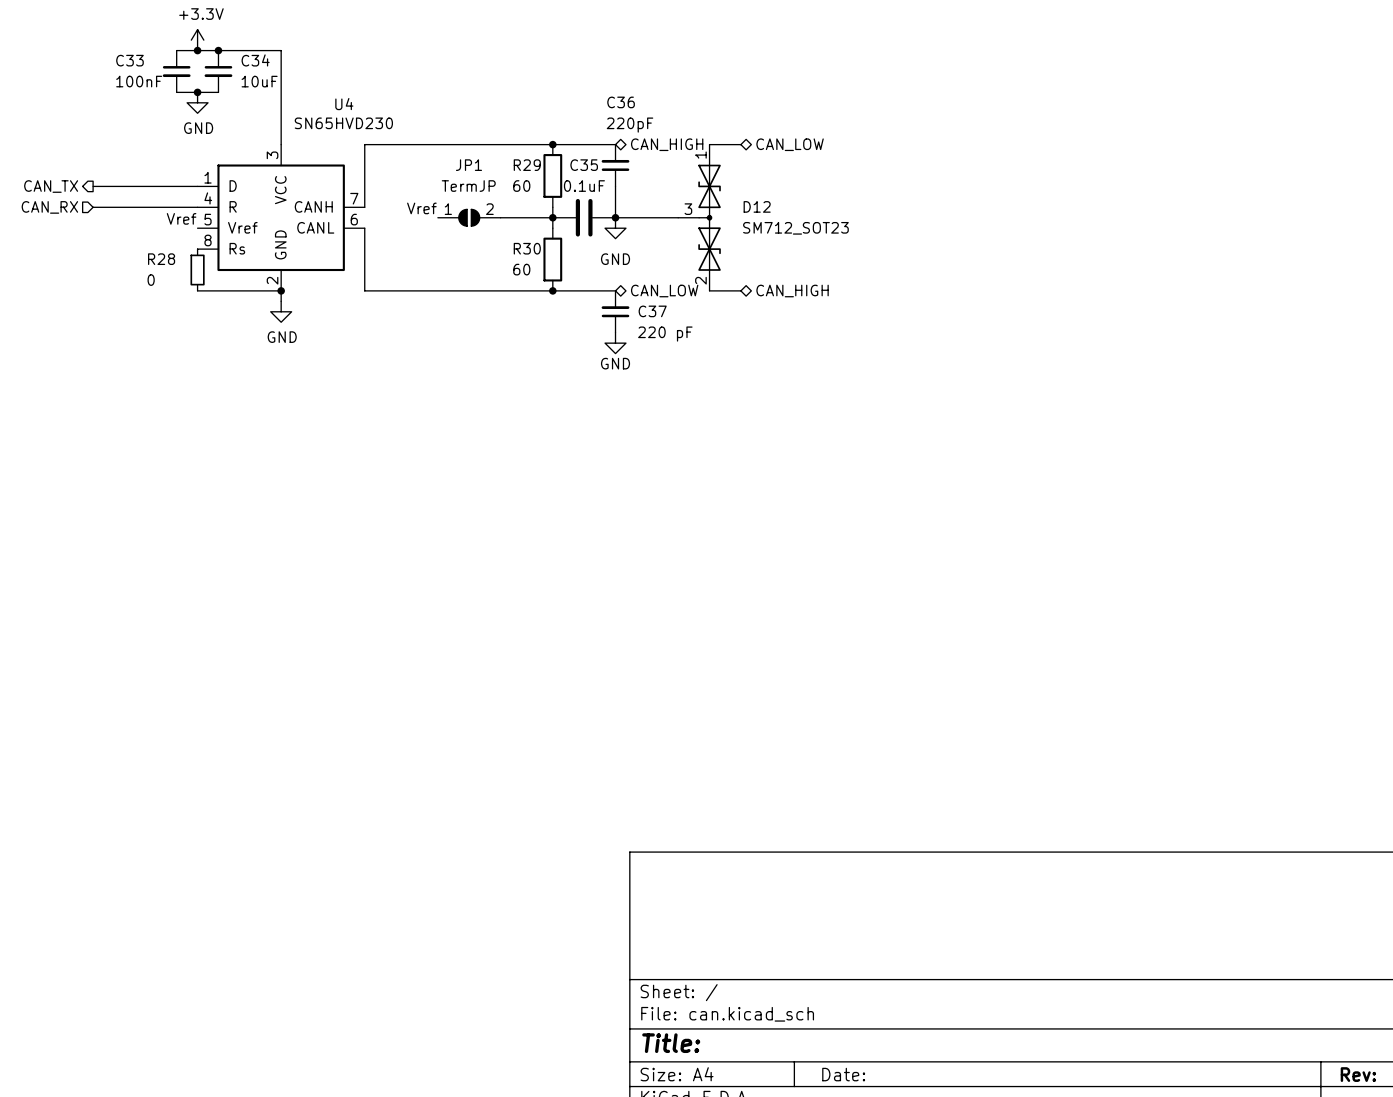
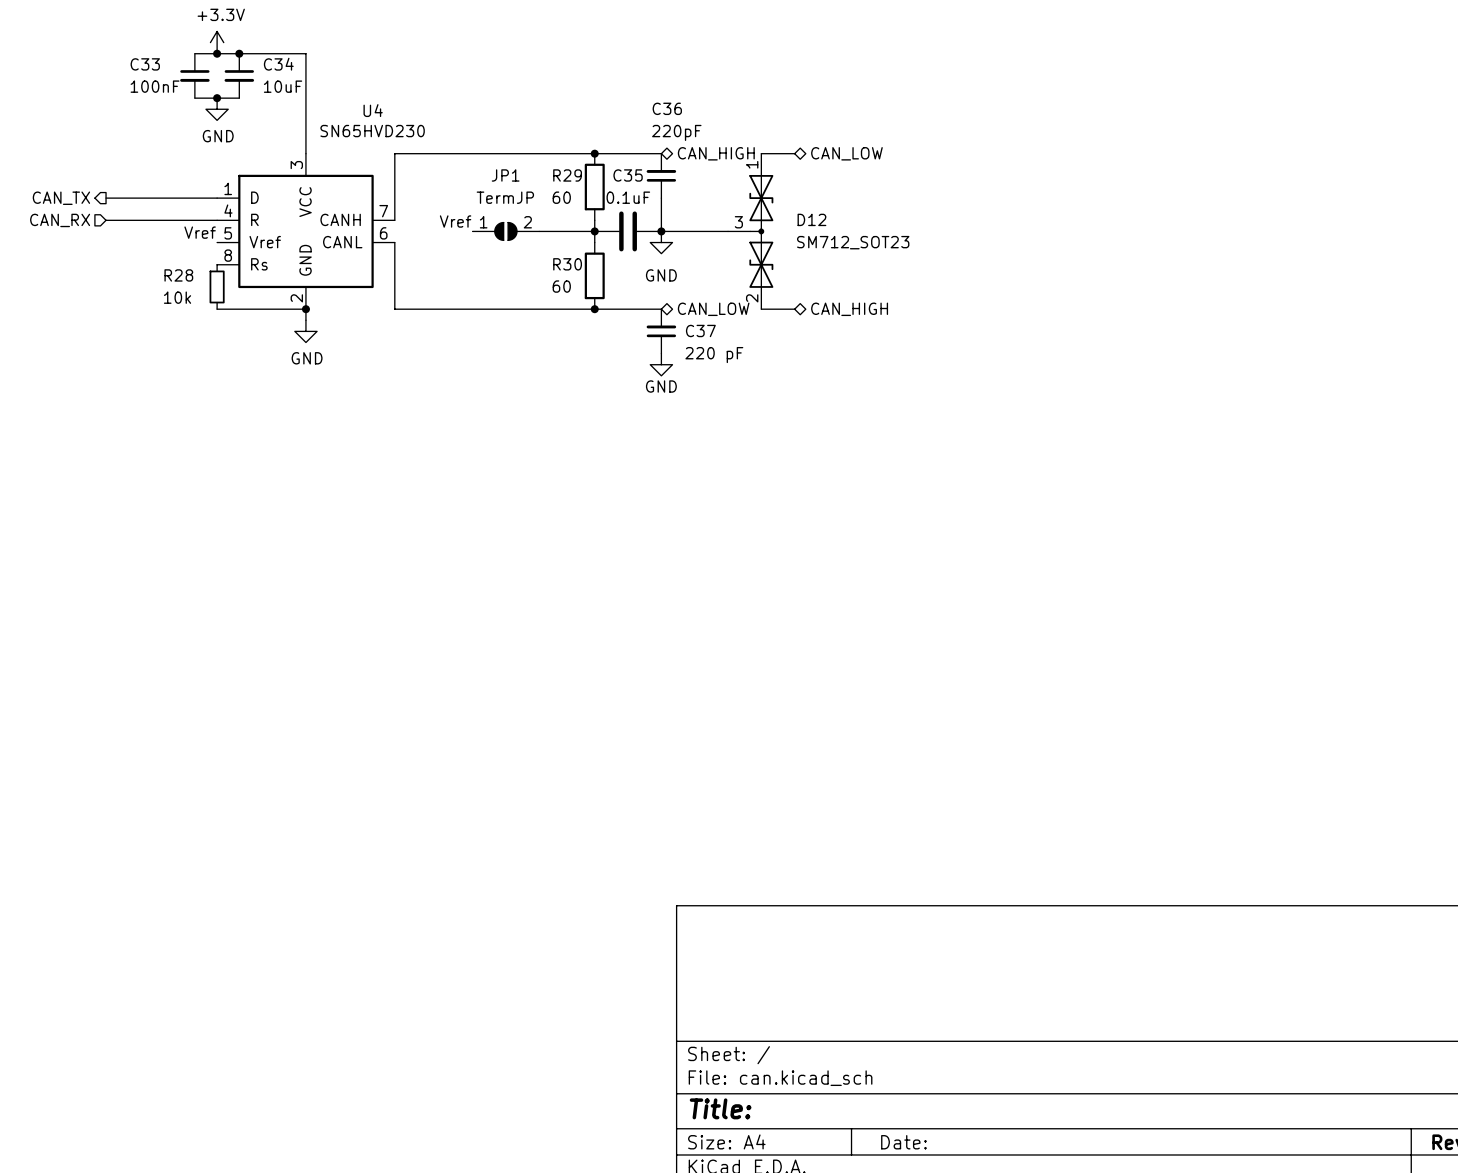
R28 value: 0 (151, 280) -> 10k (177, 297)

